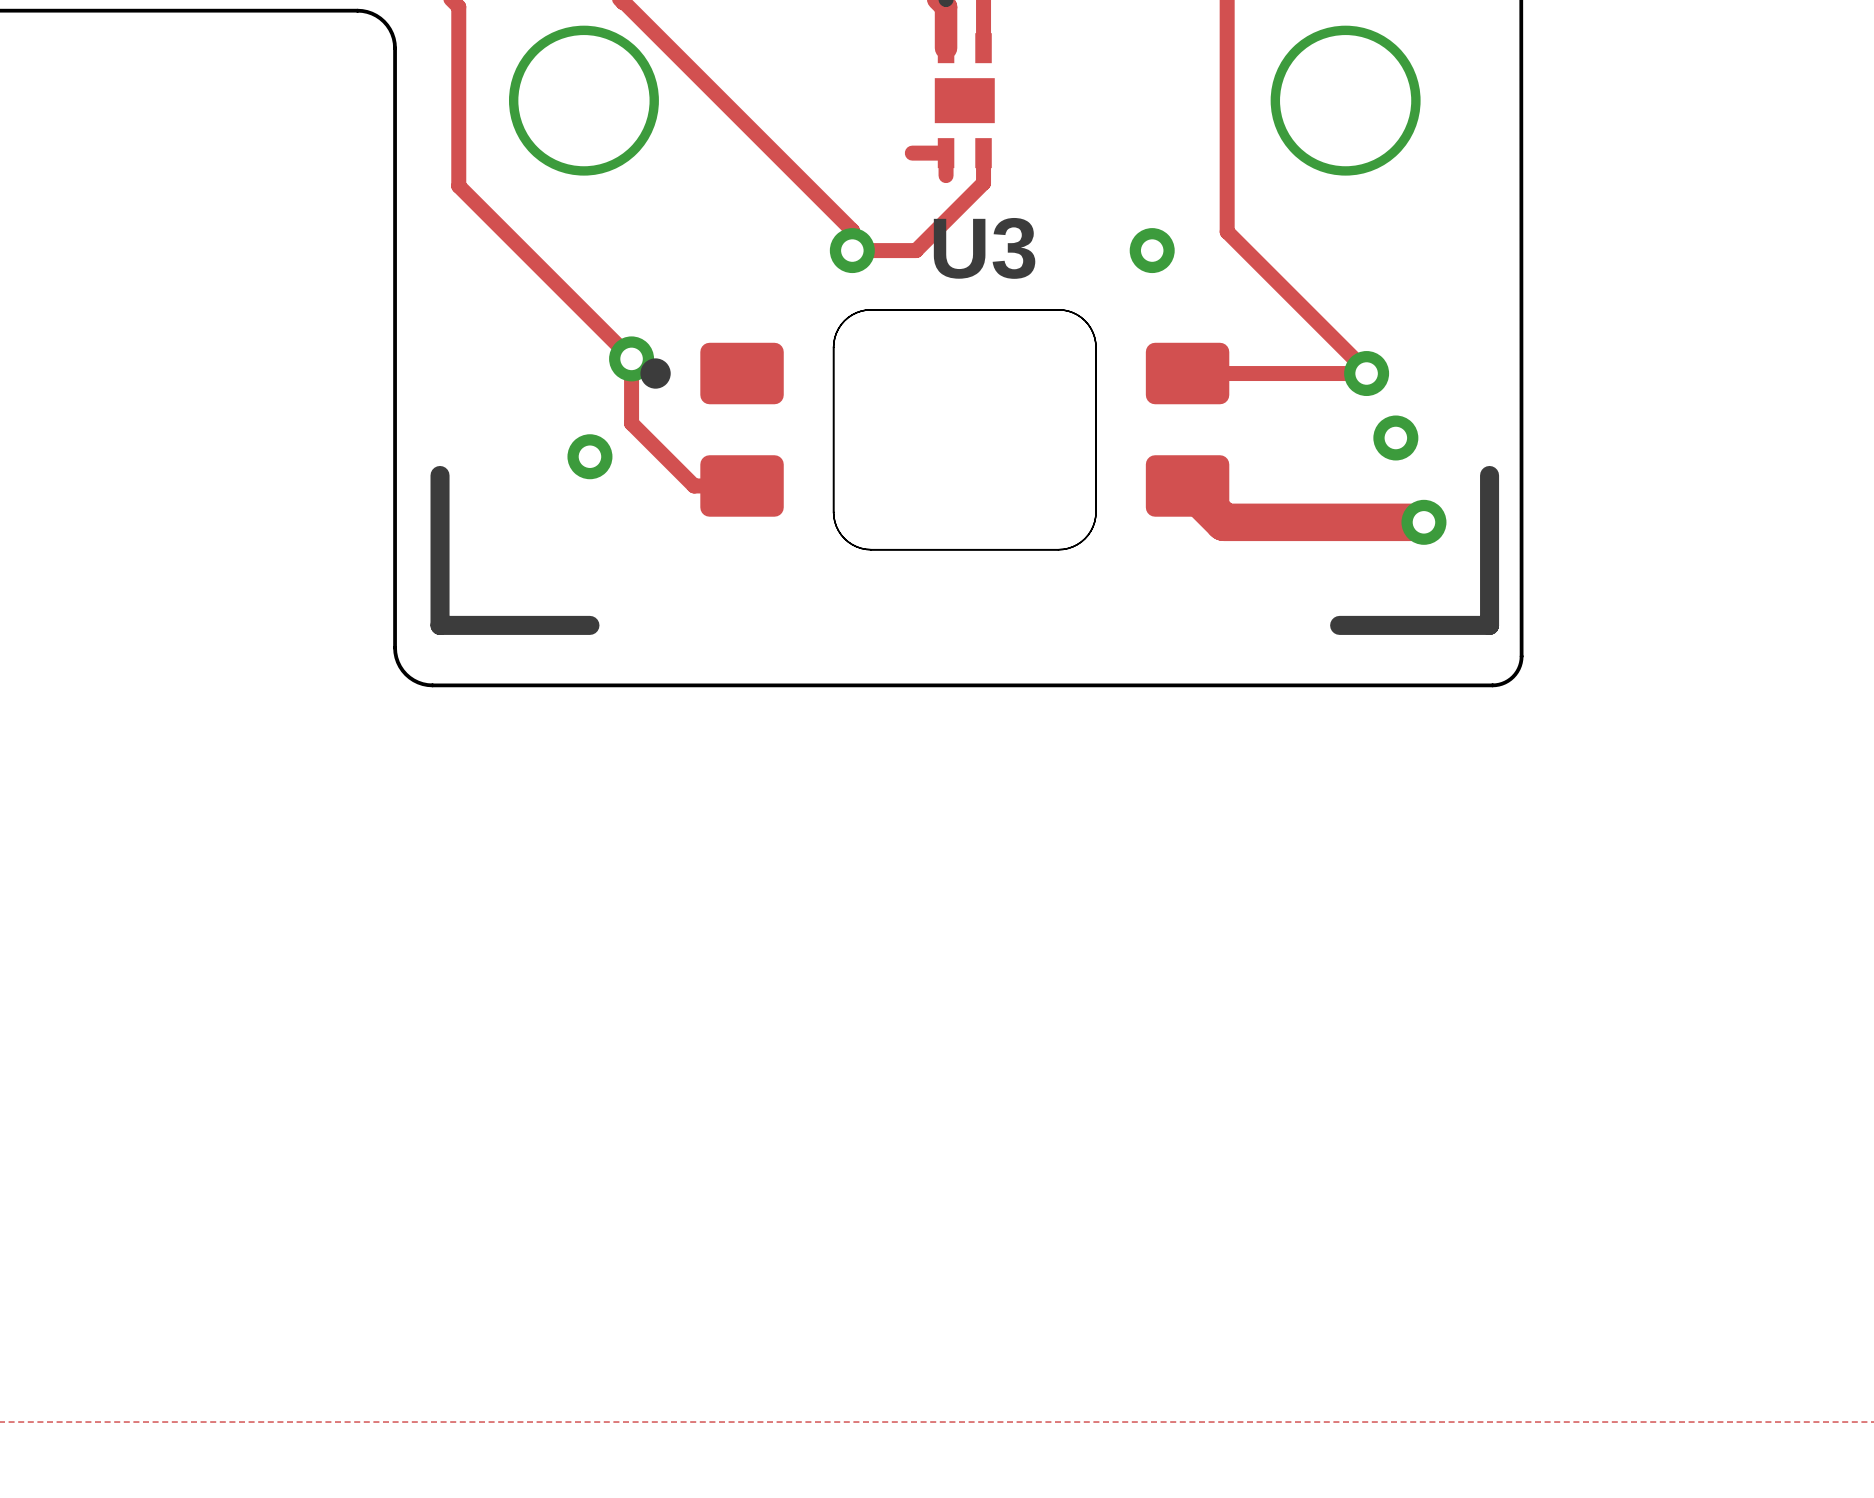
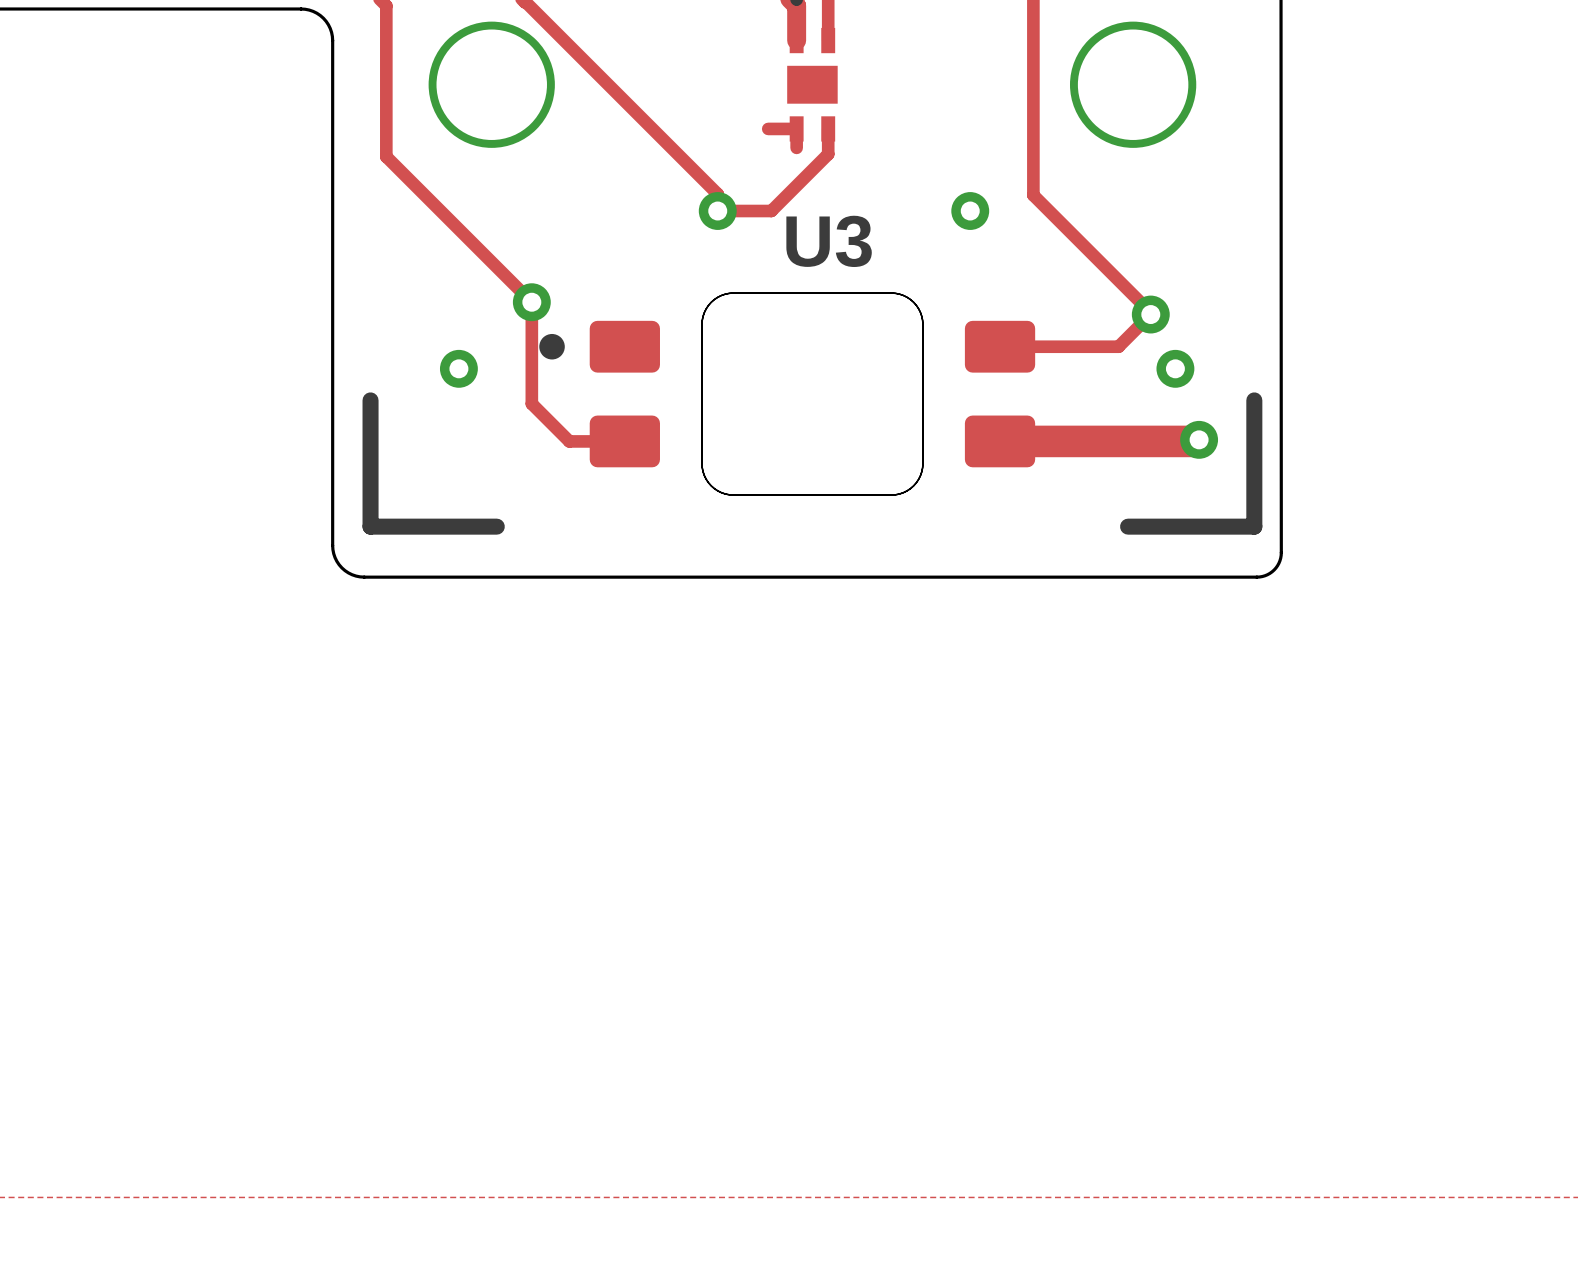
track: (1161, 373) (1366, 373) -> (1000, 346) (1118, 346) (1150, 314)
track: (631, 423) (694, 485) (767, 485) -> (531, 356) (531, 403) (569, 441) (624, 441)
U3 position: (934, 429) -> (787, 394)
part position: (964, 429) -> (812, 394)
via position: (589, 456) -> (458, 368)
track: (1187, 485) (1223, 522) (1423, 522) -> (1000, 441) (1197, 441) (1199, 439)

